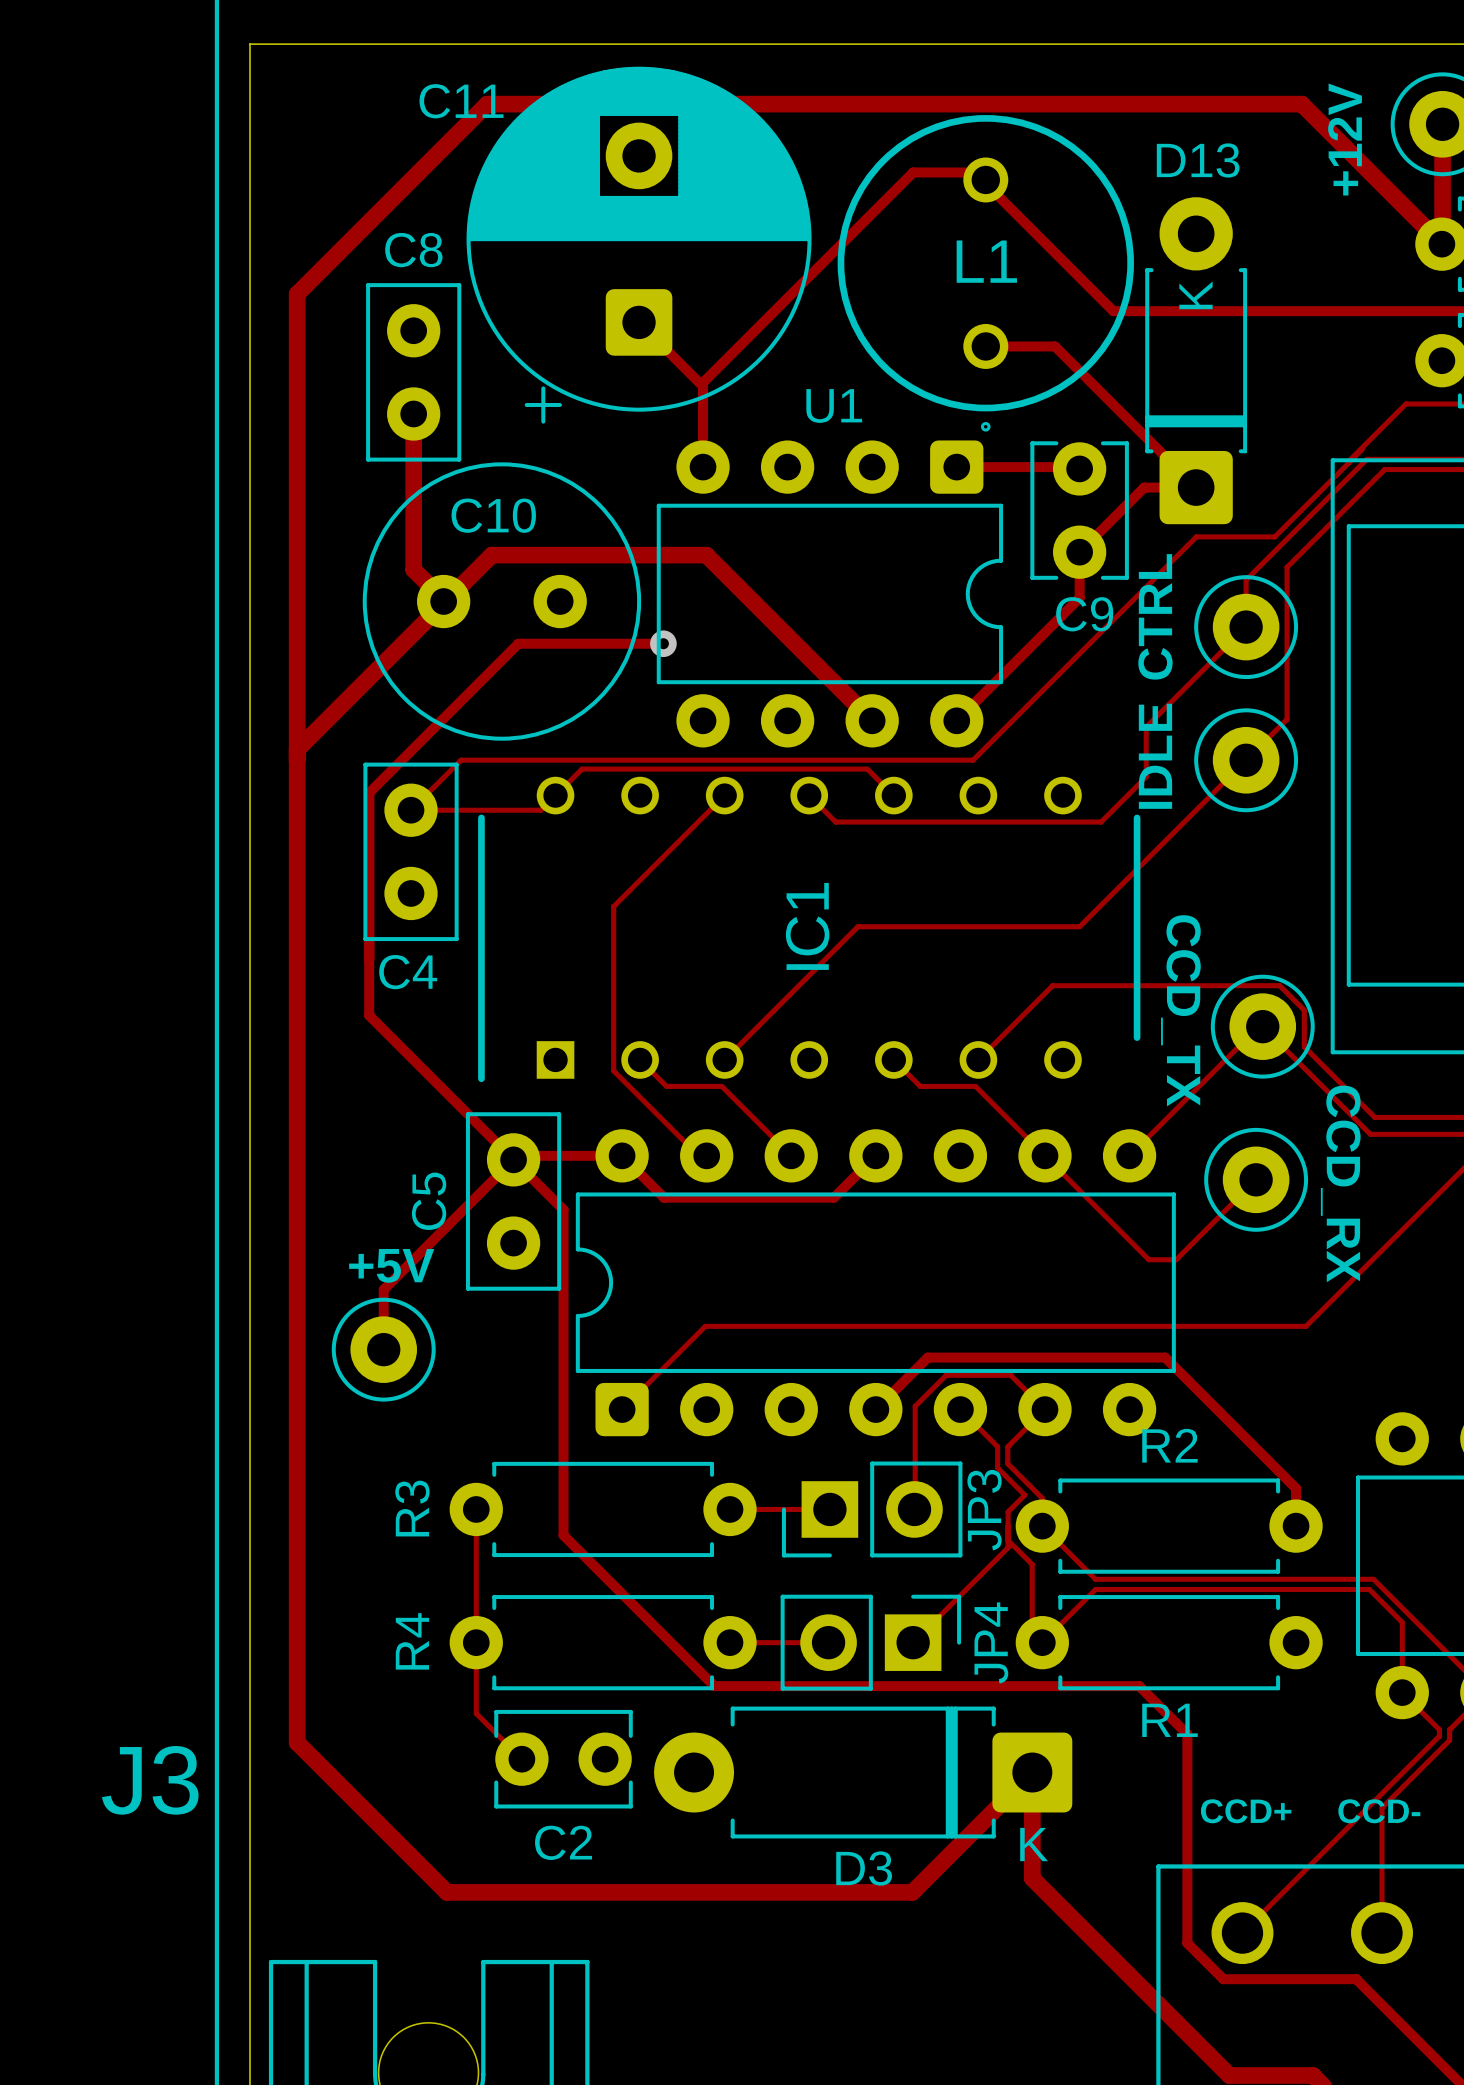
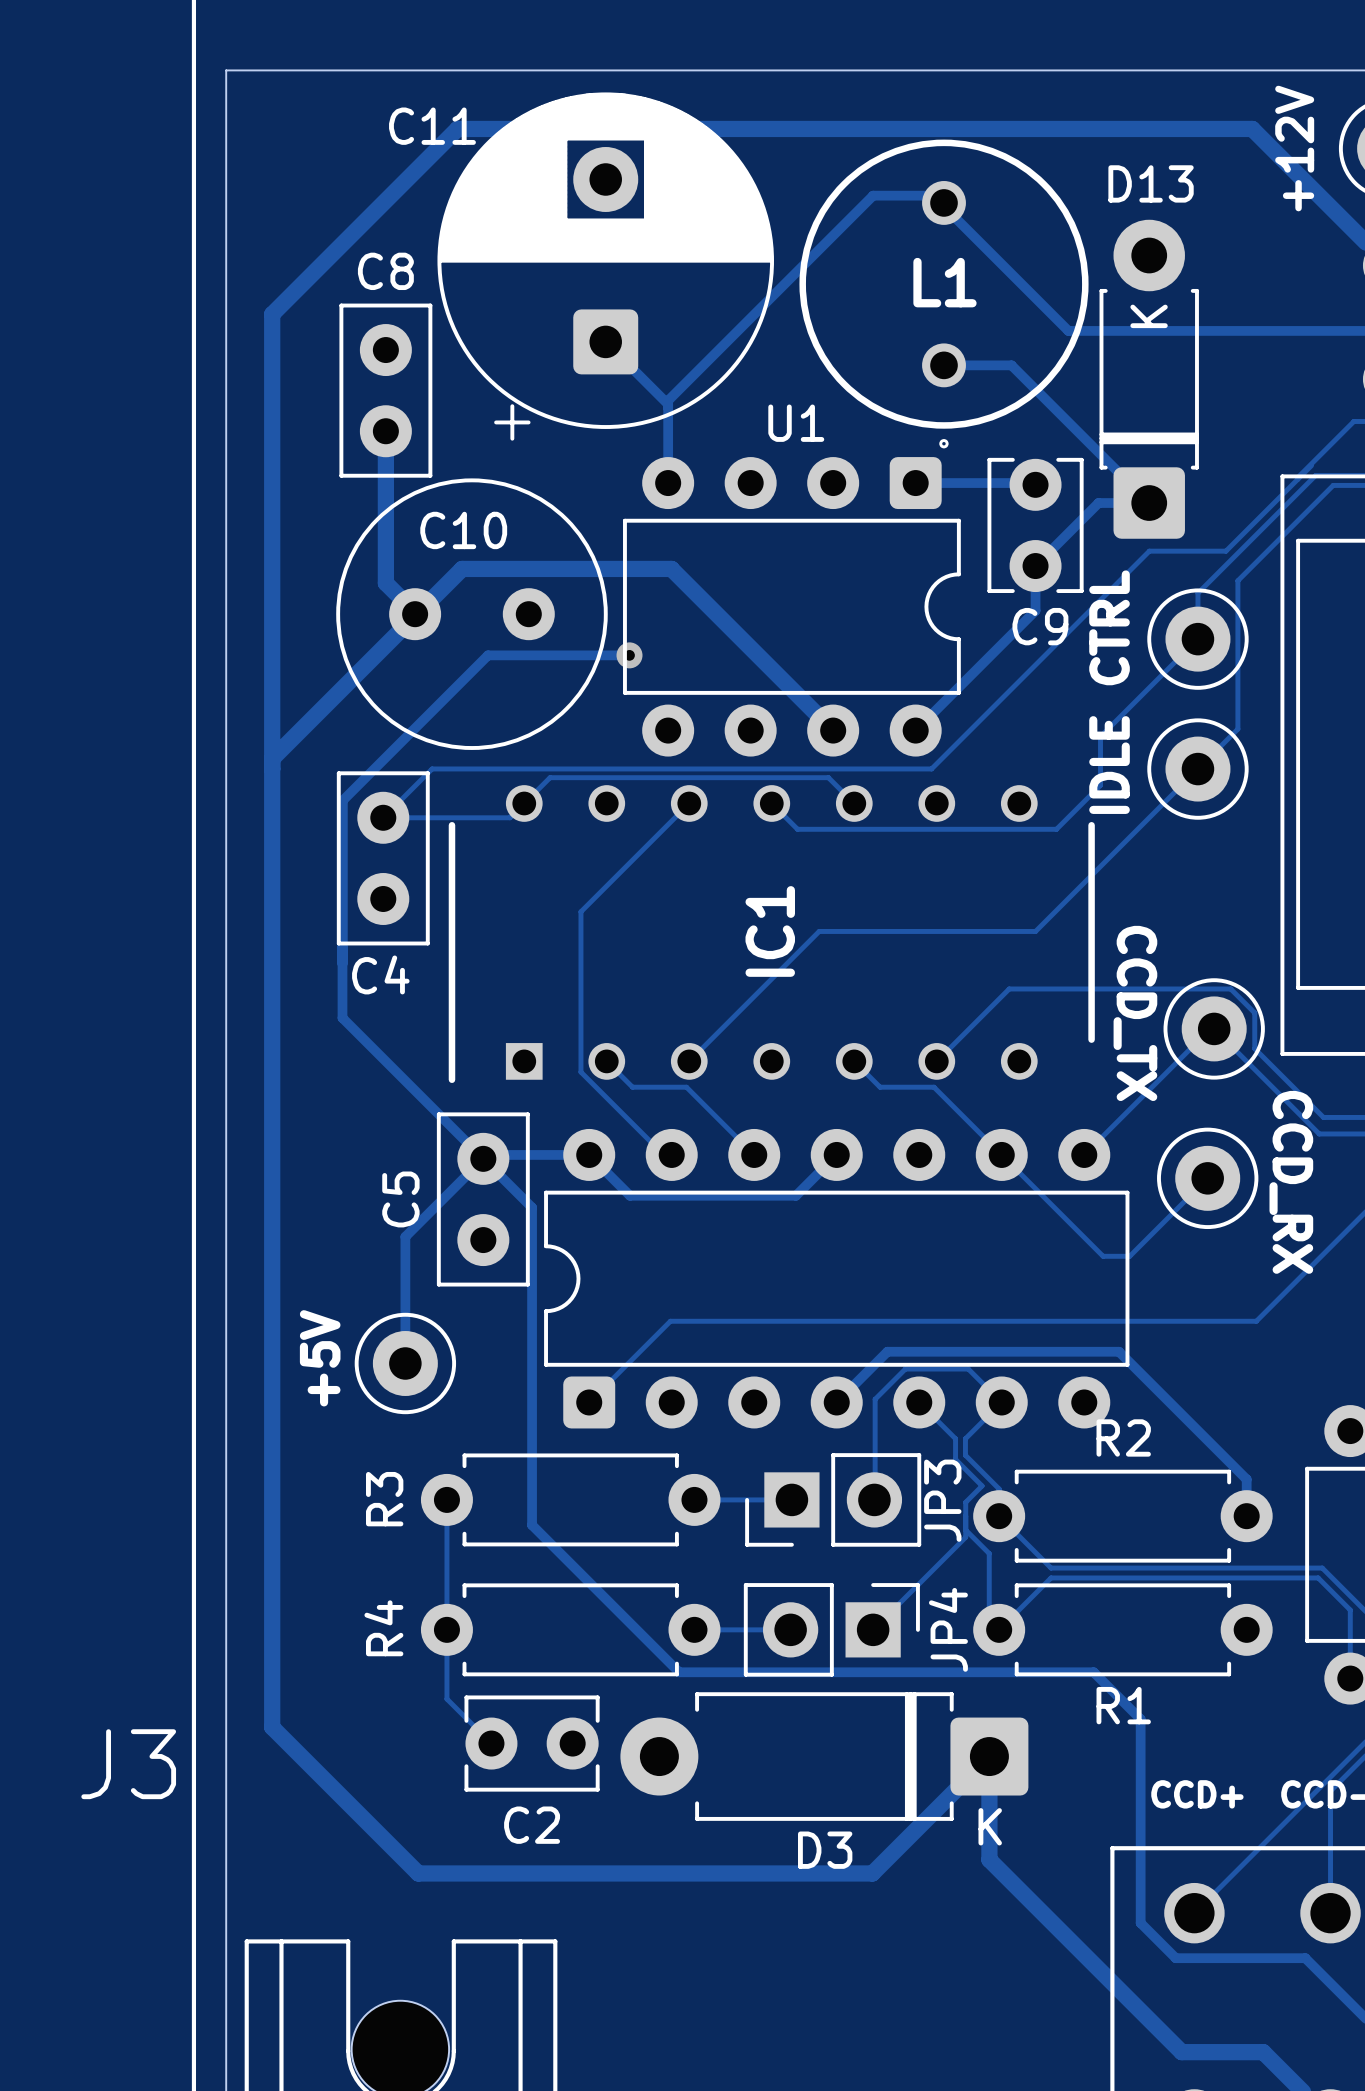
track: (433, 1239) (383, 1289) (383, 1349) -> (405, 1236) (405, 1363)
text rotation: 0° (391, 1265) -> 90° counterclockwise (320, 1358)
part position: (383, 1349) -> (405, 1363)

